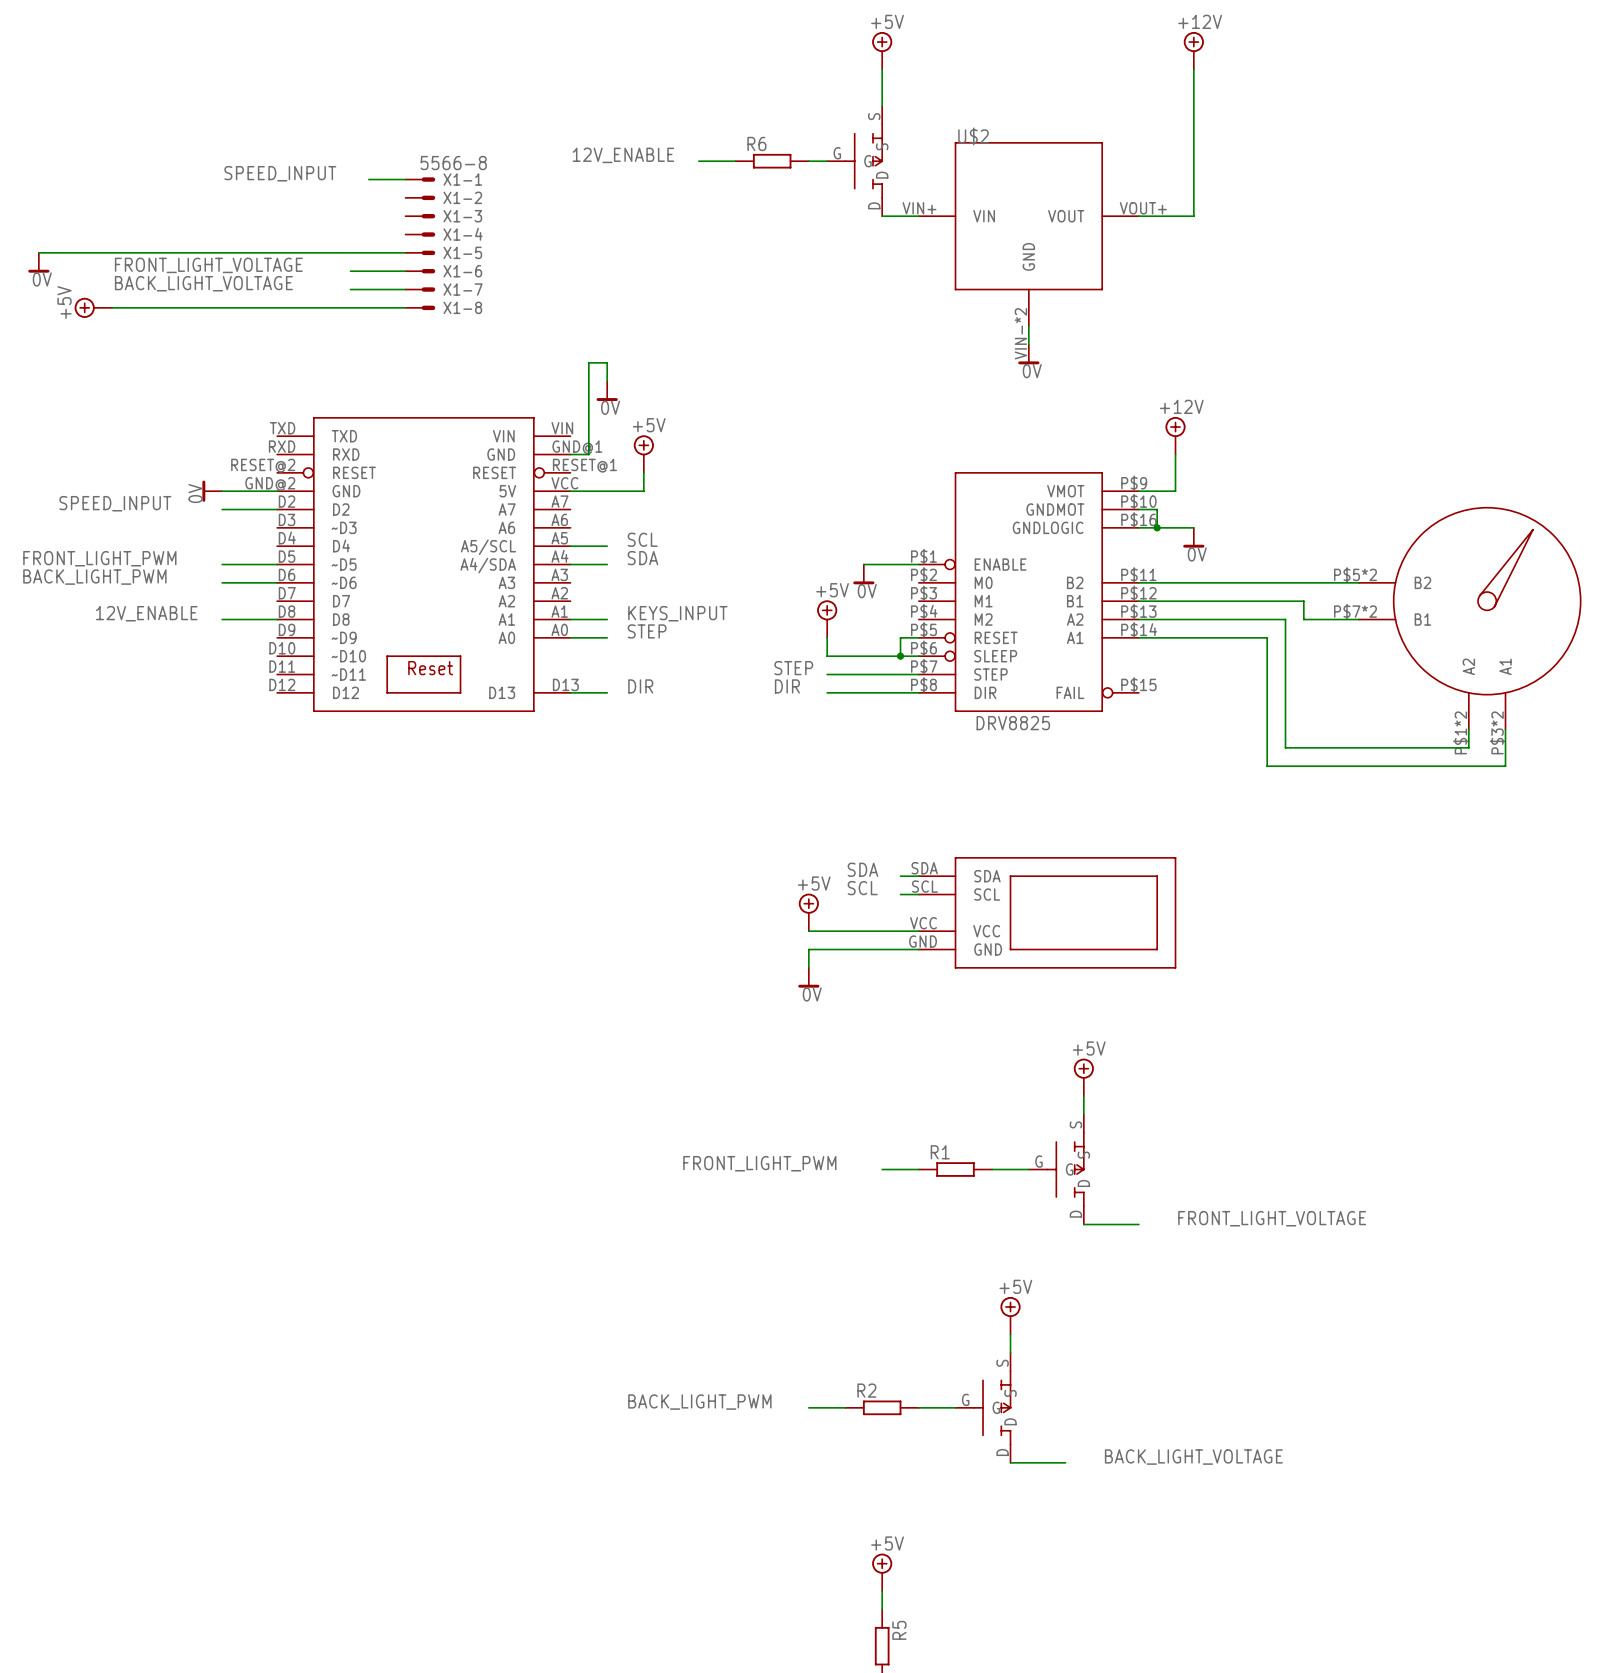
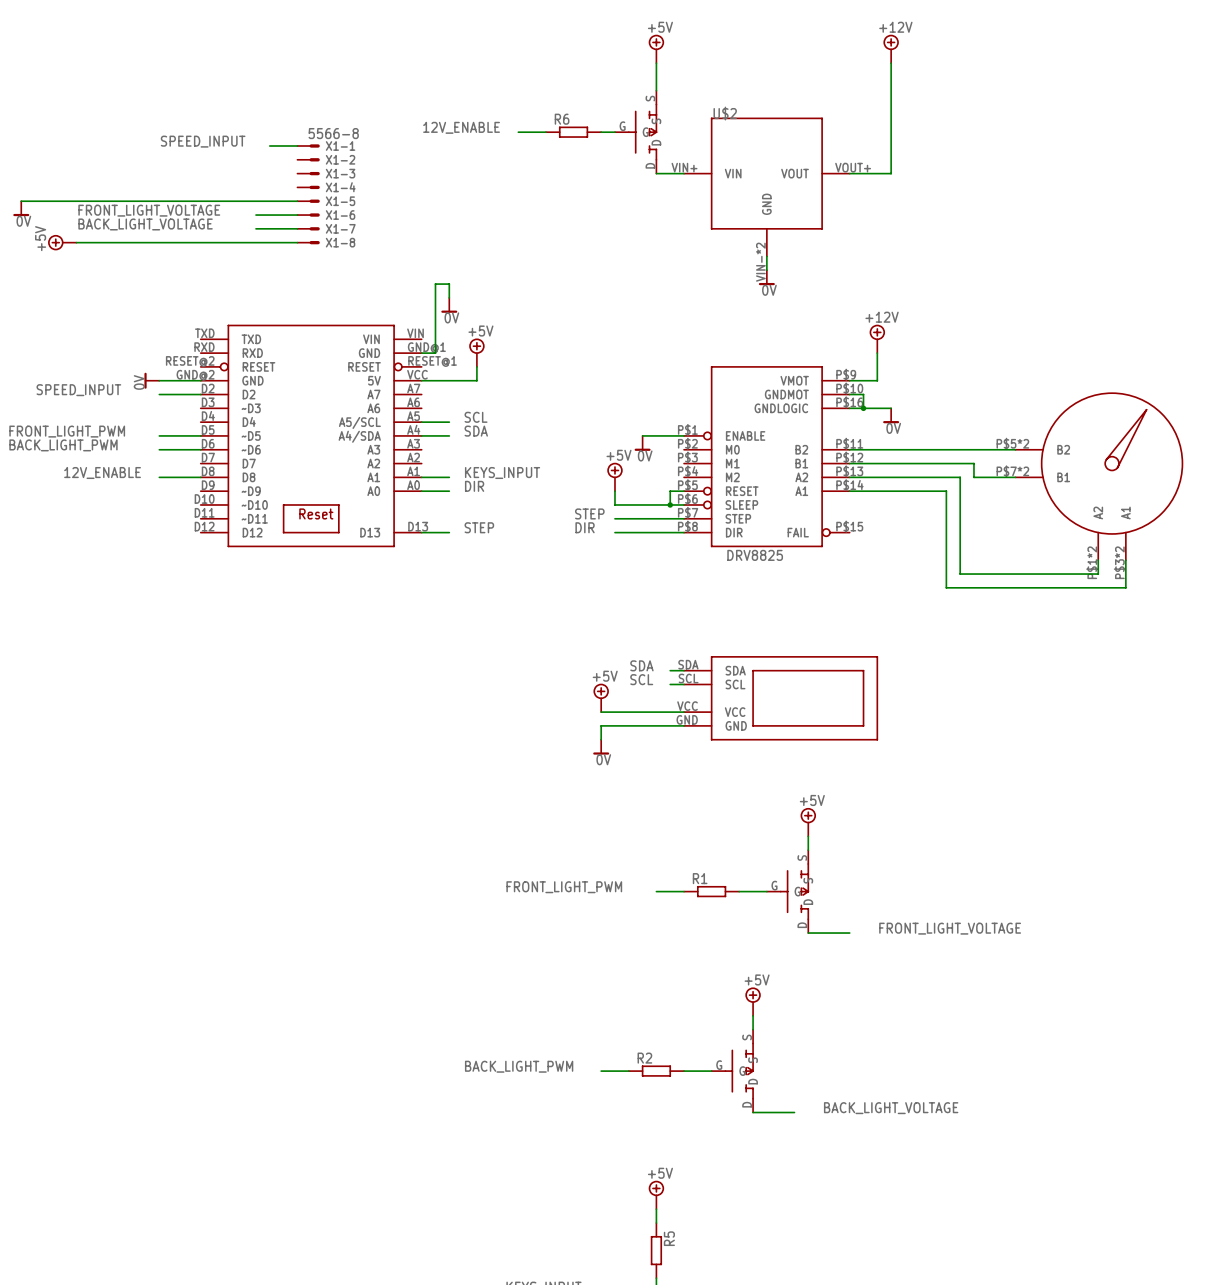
label: STEP (647, 631) -> DIR (474, 486)
label: DIR (640, 686) -> STEP (479, 527)

